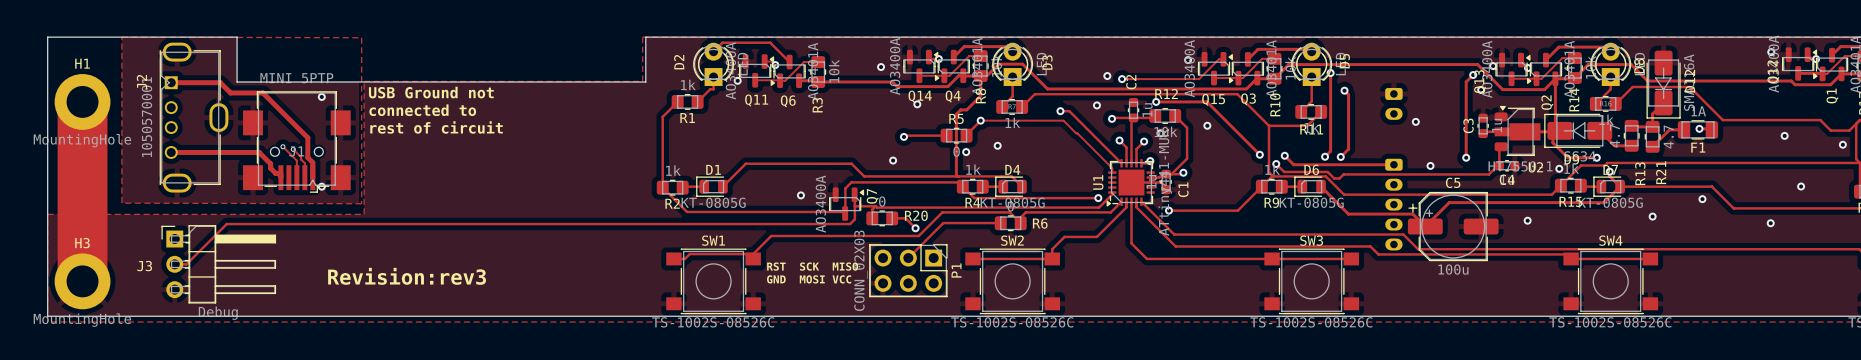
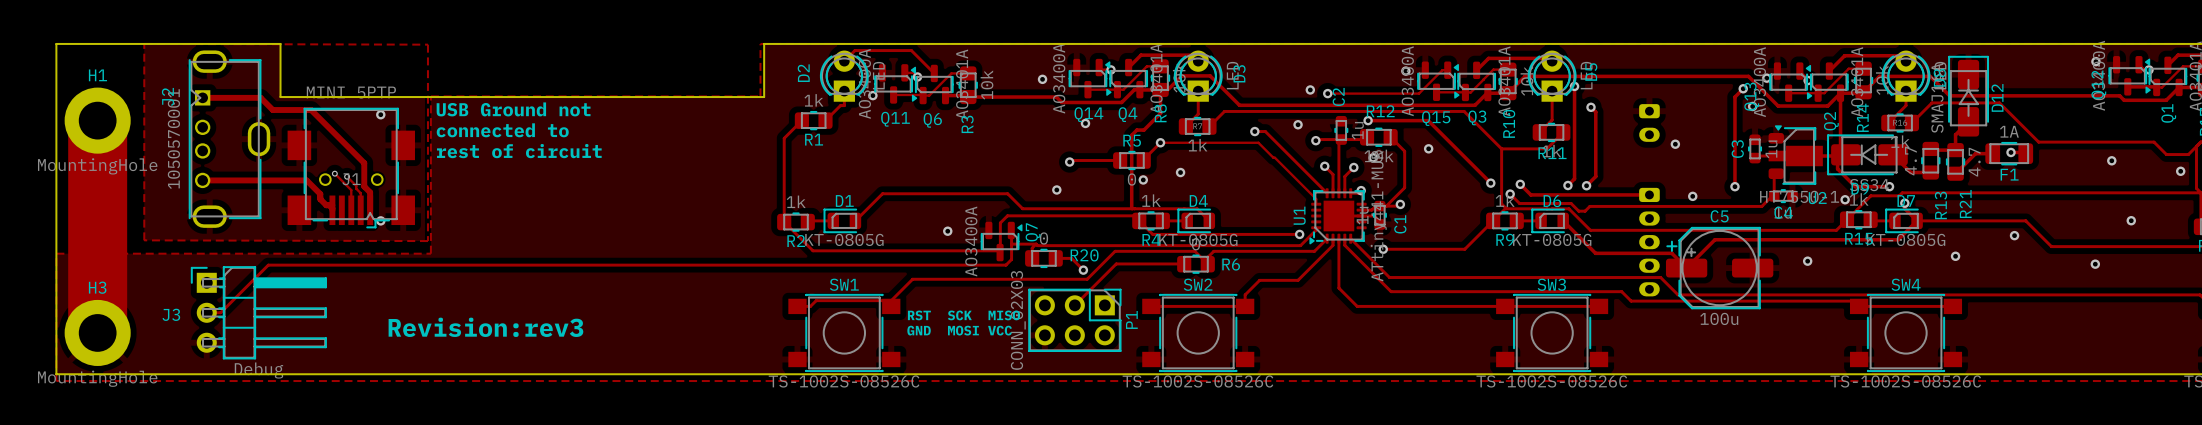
D12 rotation: 0° (1663, 84) -> 180° (1968, 96)

